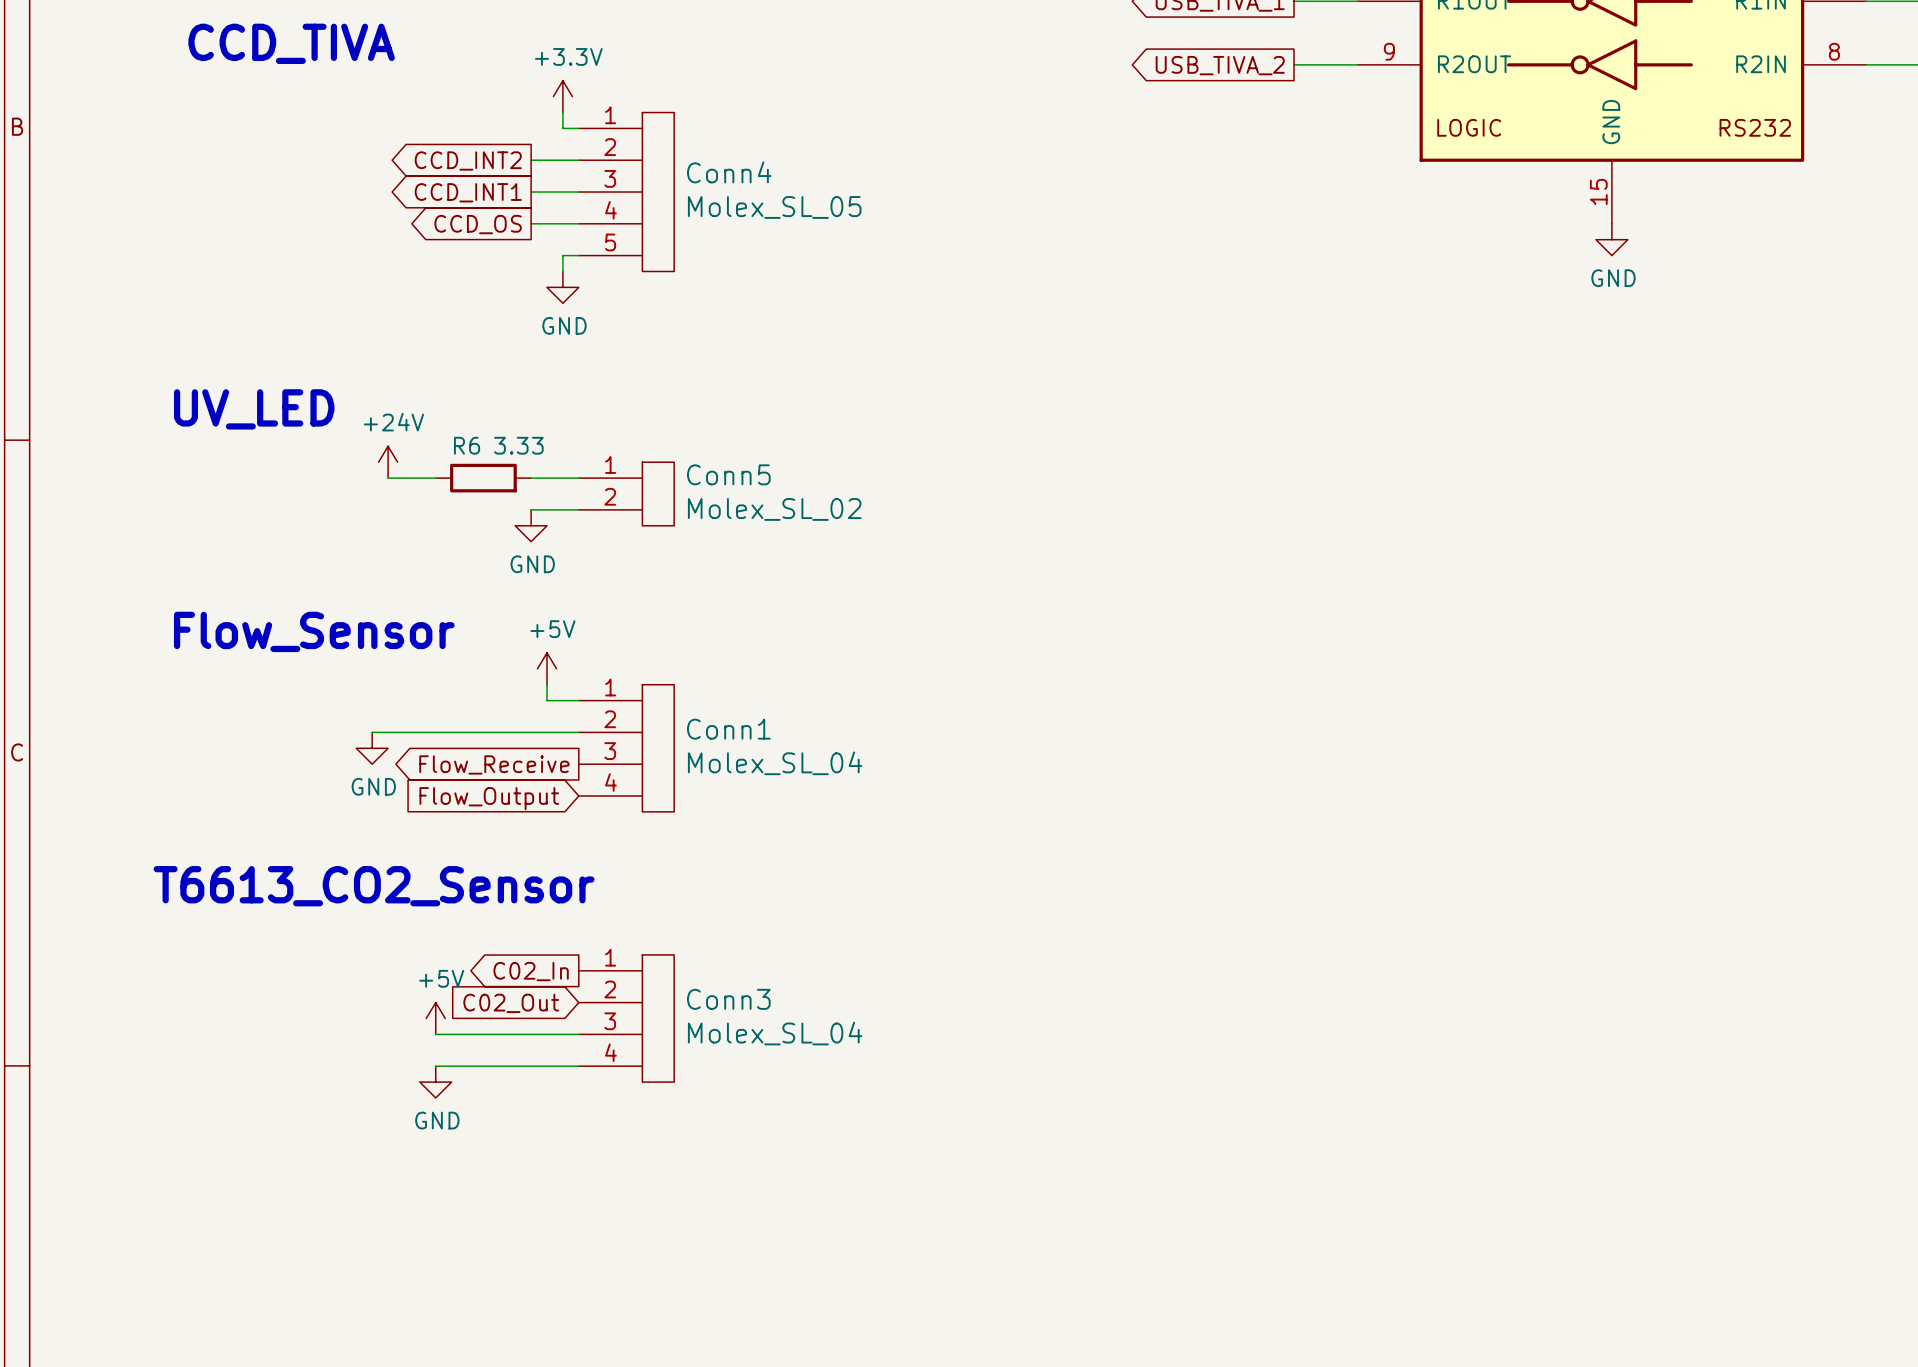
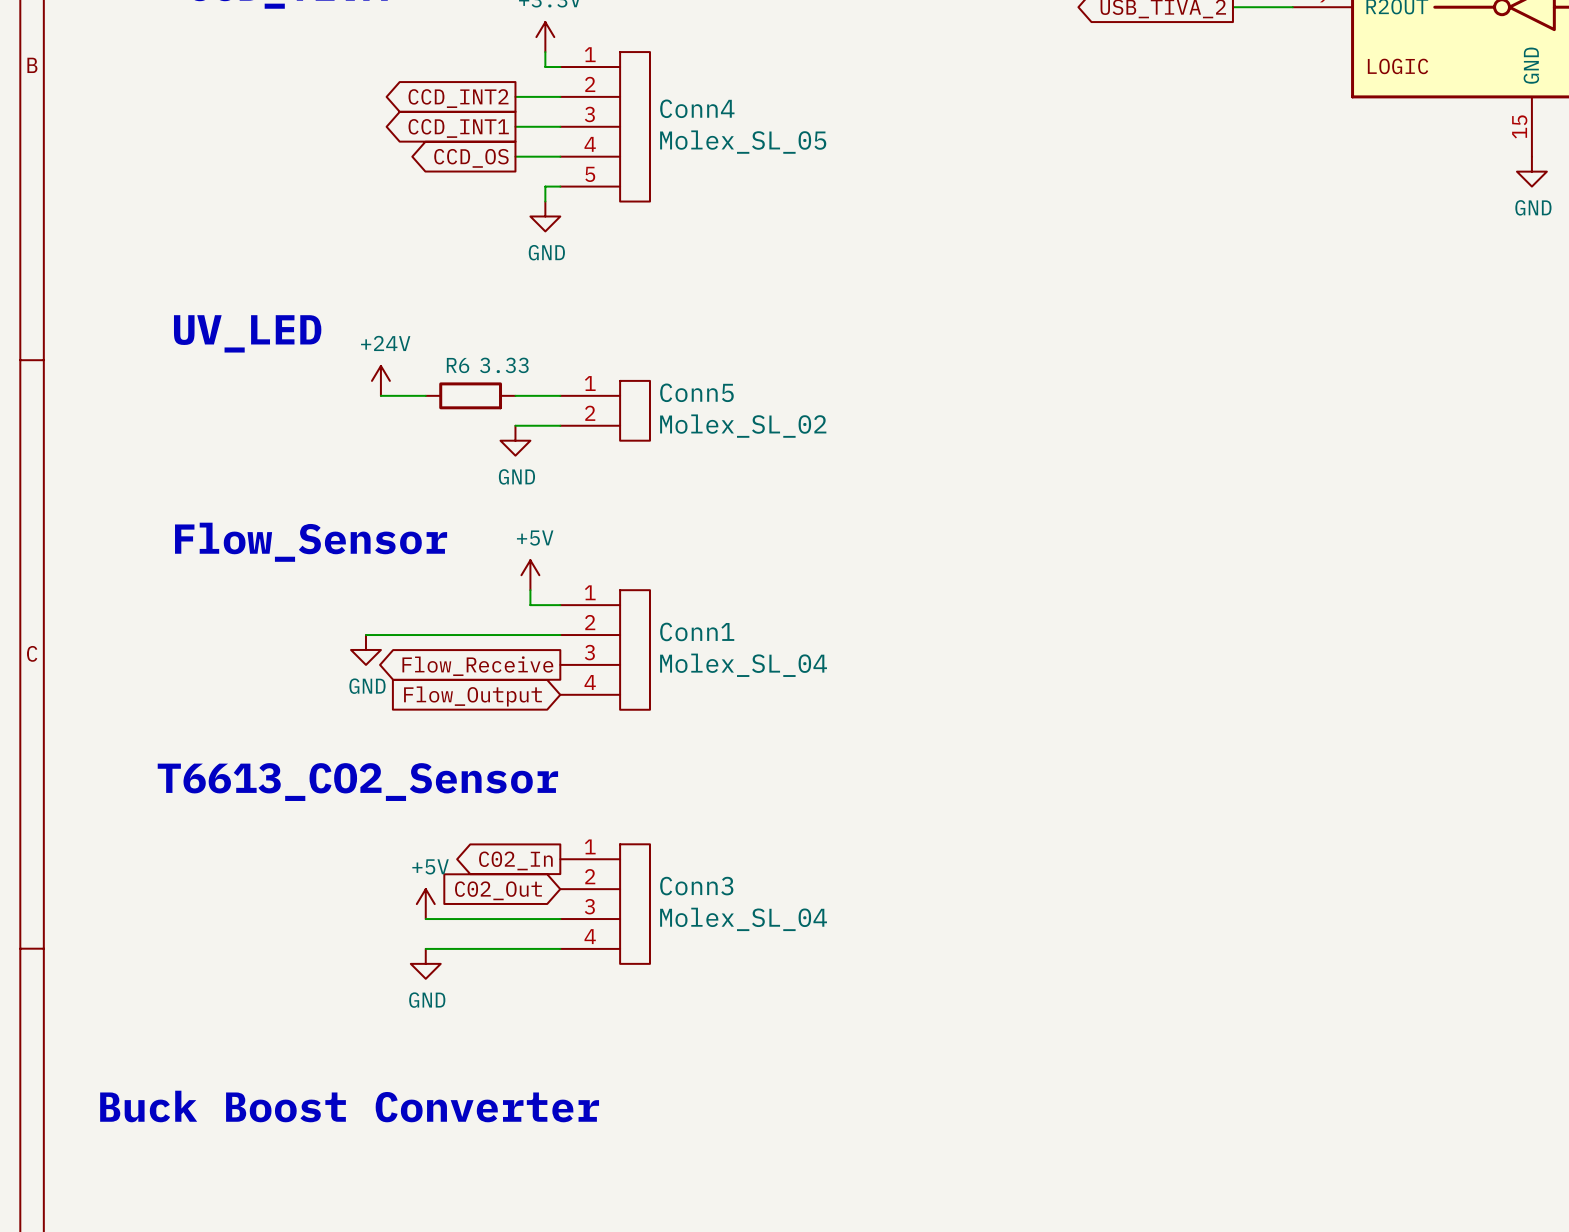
text: none -> Buck Boost Converter (349, 1106)

